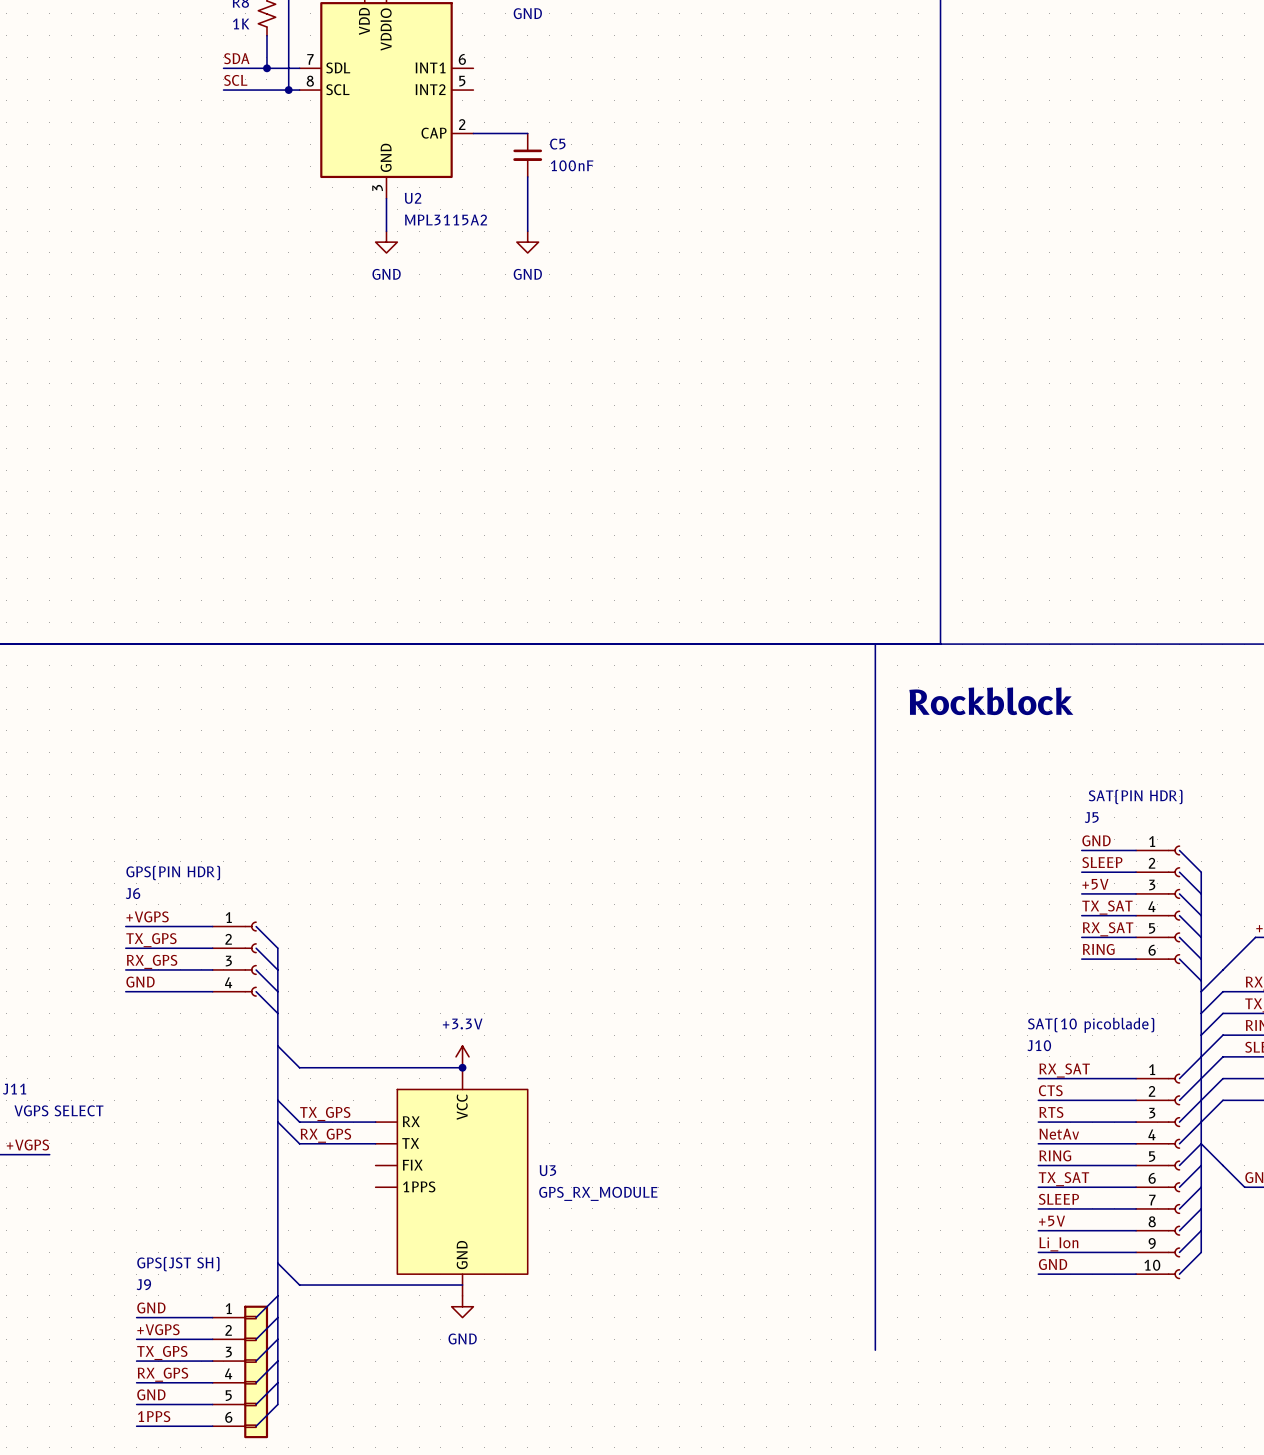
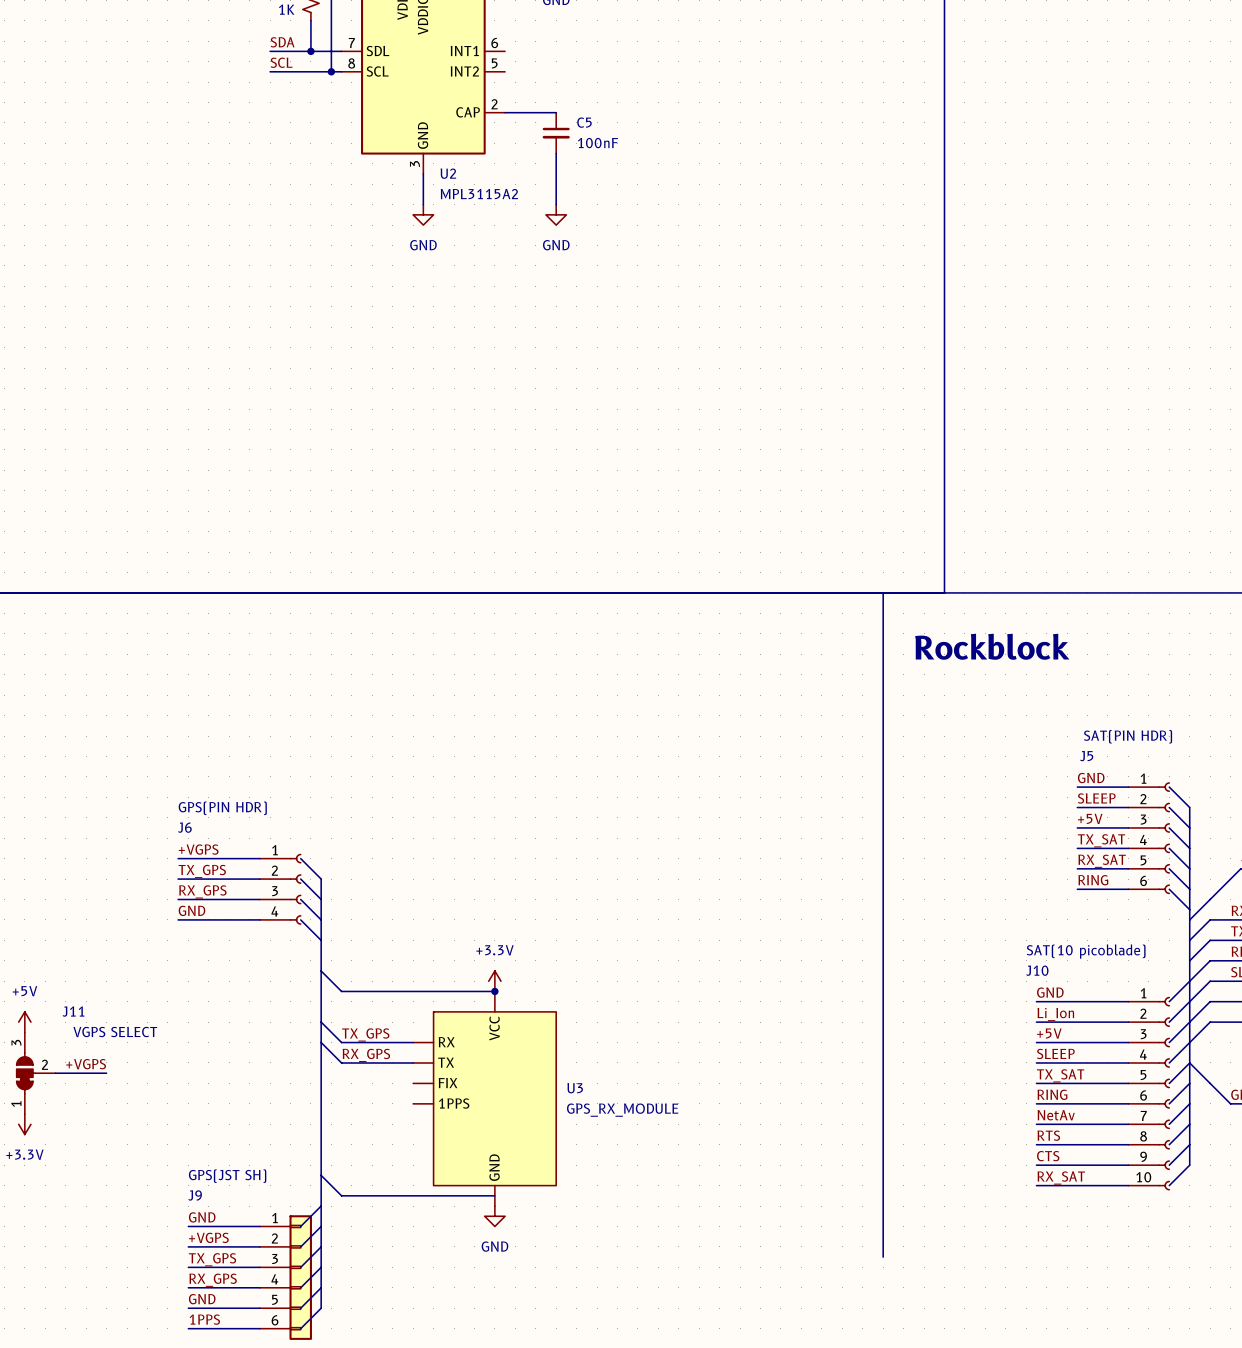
label: RX_SAT (1064, 1070) -> GND (1050, 992)
label: CTS (1050, 1090) -> Li_Ion (1055, 1014)
label: RTS (1051, 1112) -> +5V (1049, 1033)
label: NetAv (1059, 1134) -> SLEEP (1055, 1053)
label: RING (1055, 1155) -> TX_SAT (1060, 1075)
label: TX_SAT (1064, 1179) -> RING (1052, 1094)
label: SLEEP (1058, 1199) -> NetAv (1056, 1115)
label: +5V (1052, 1221) -> RTS (1048, 1135)
label: Li_Ion (1058, 1244) -> CTS (1048, 1156)
label: GND (1053, 1264) -> RX_SAT (1061, 1178)

